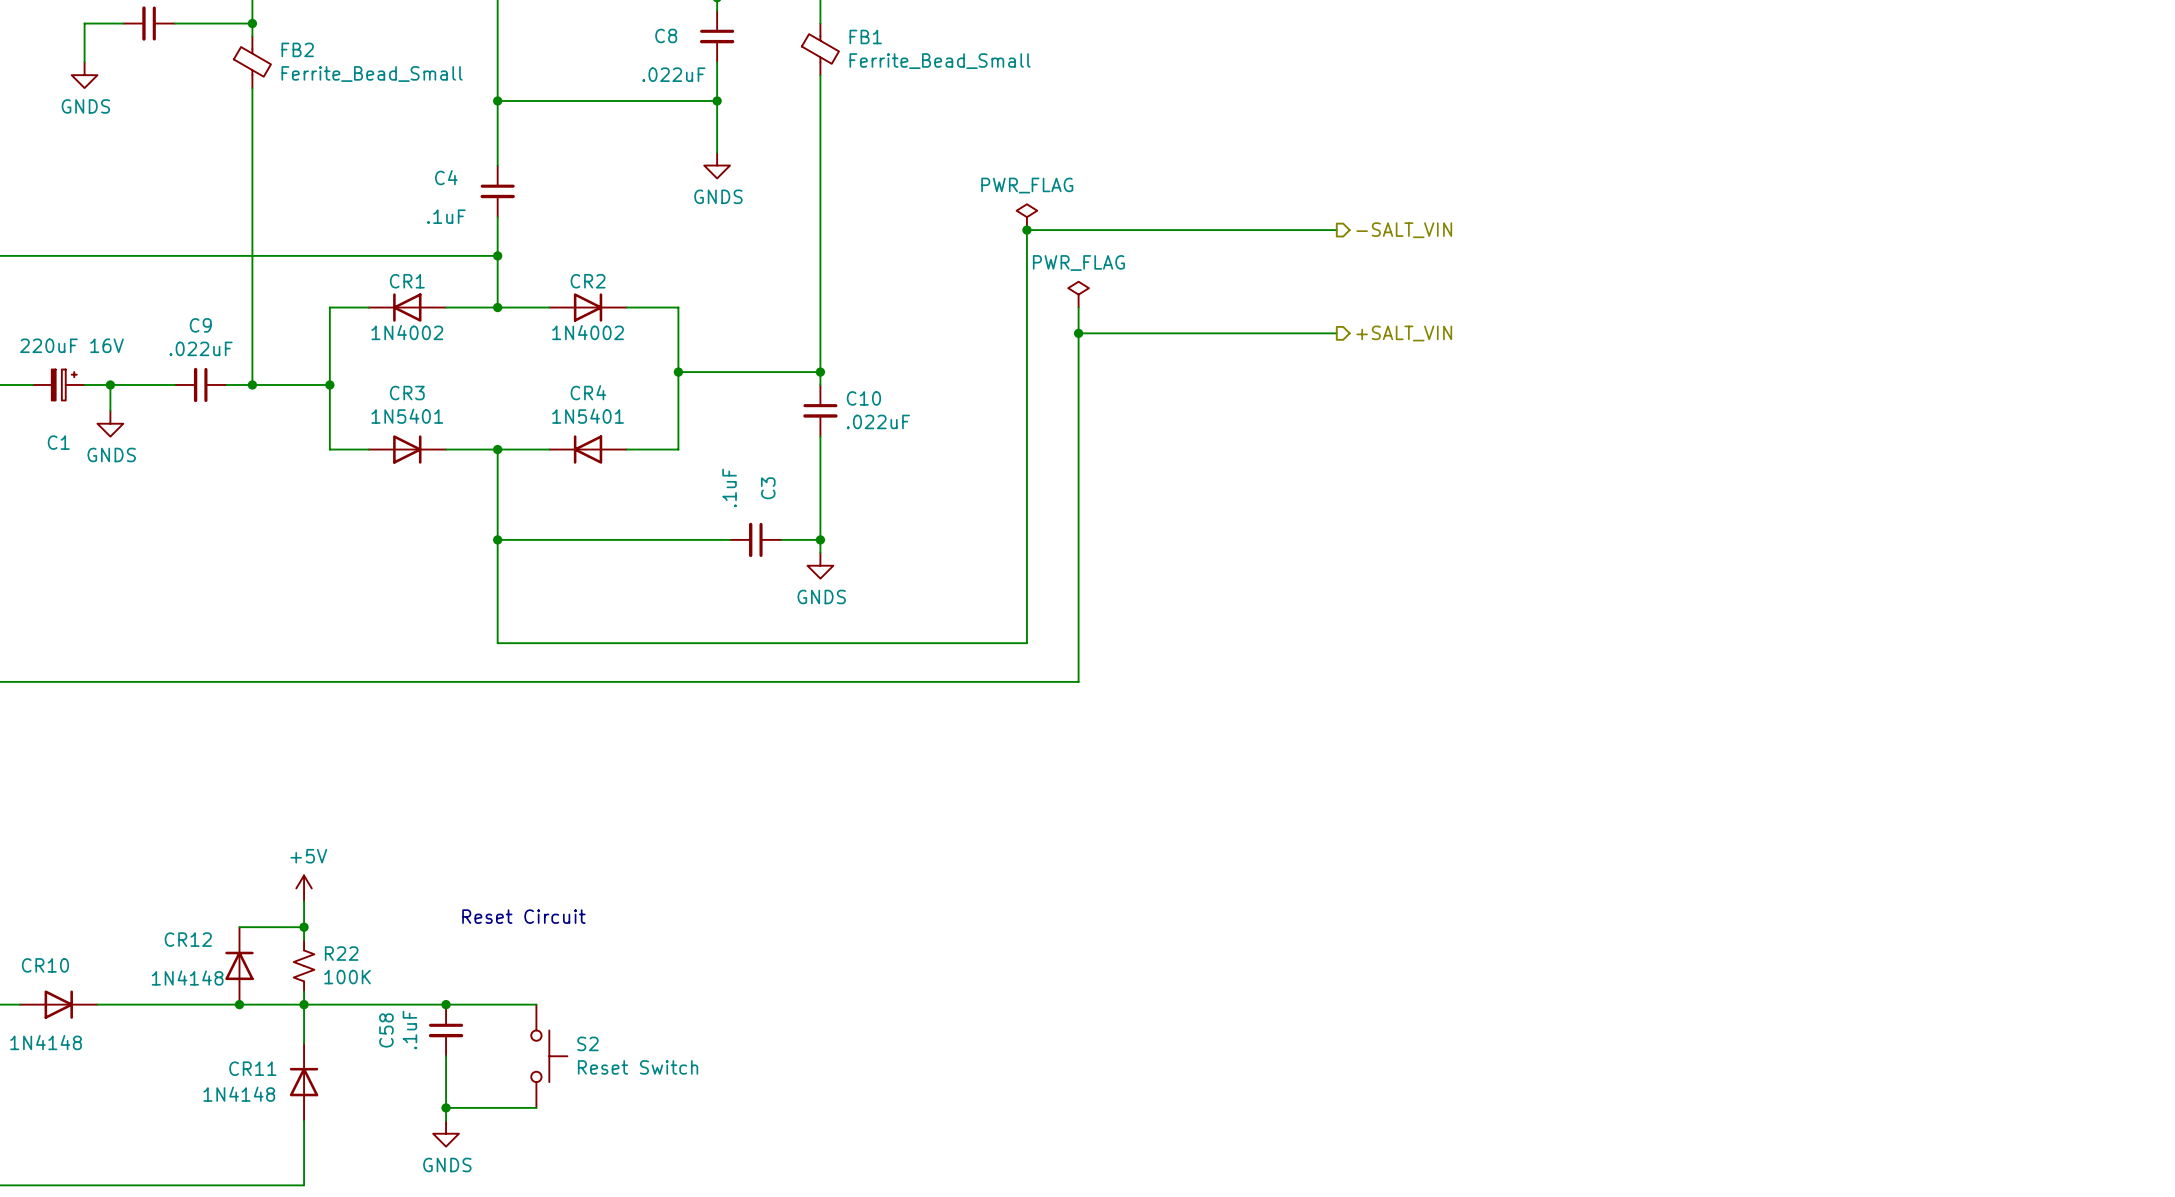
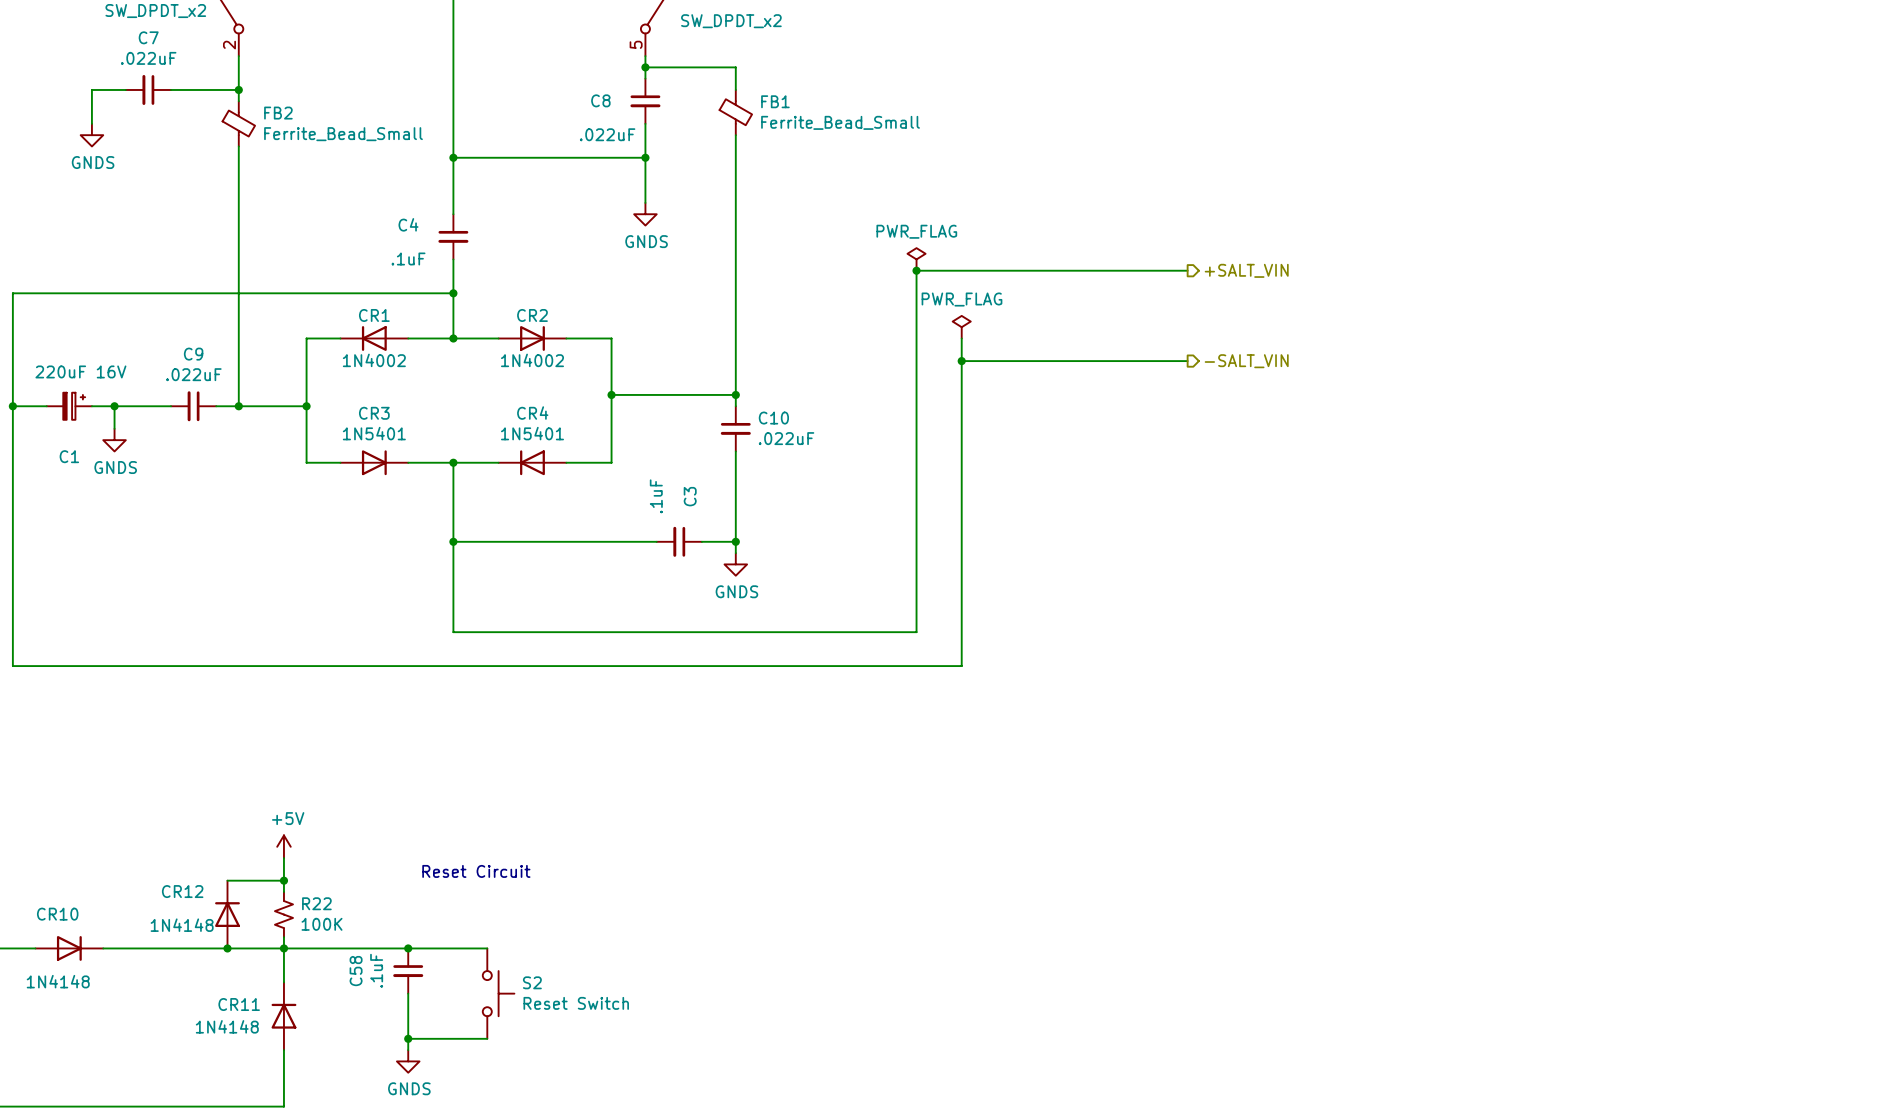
hierarchical label: -SALT_VIN (1404, 230) -> +SALT_VIN (1246, 270)
hierarchical label: +SALT_VIN (1404, 333) -> -SALT_VIN (1246, 361)

